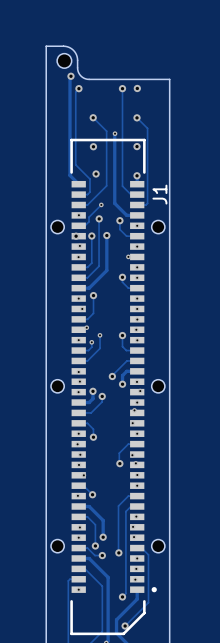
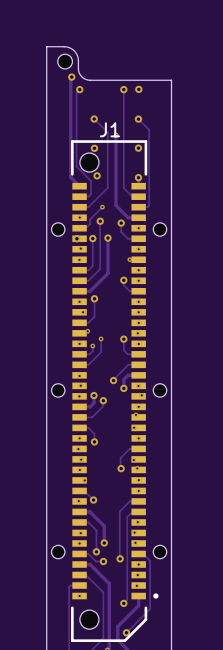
J1 footprint: [70, 138, 157, 636] -> [71, 140, 159, 642]
J1 name position: J1 (159, 194) -> J1 (109, 129)

